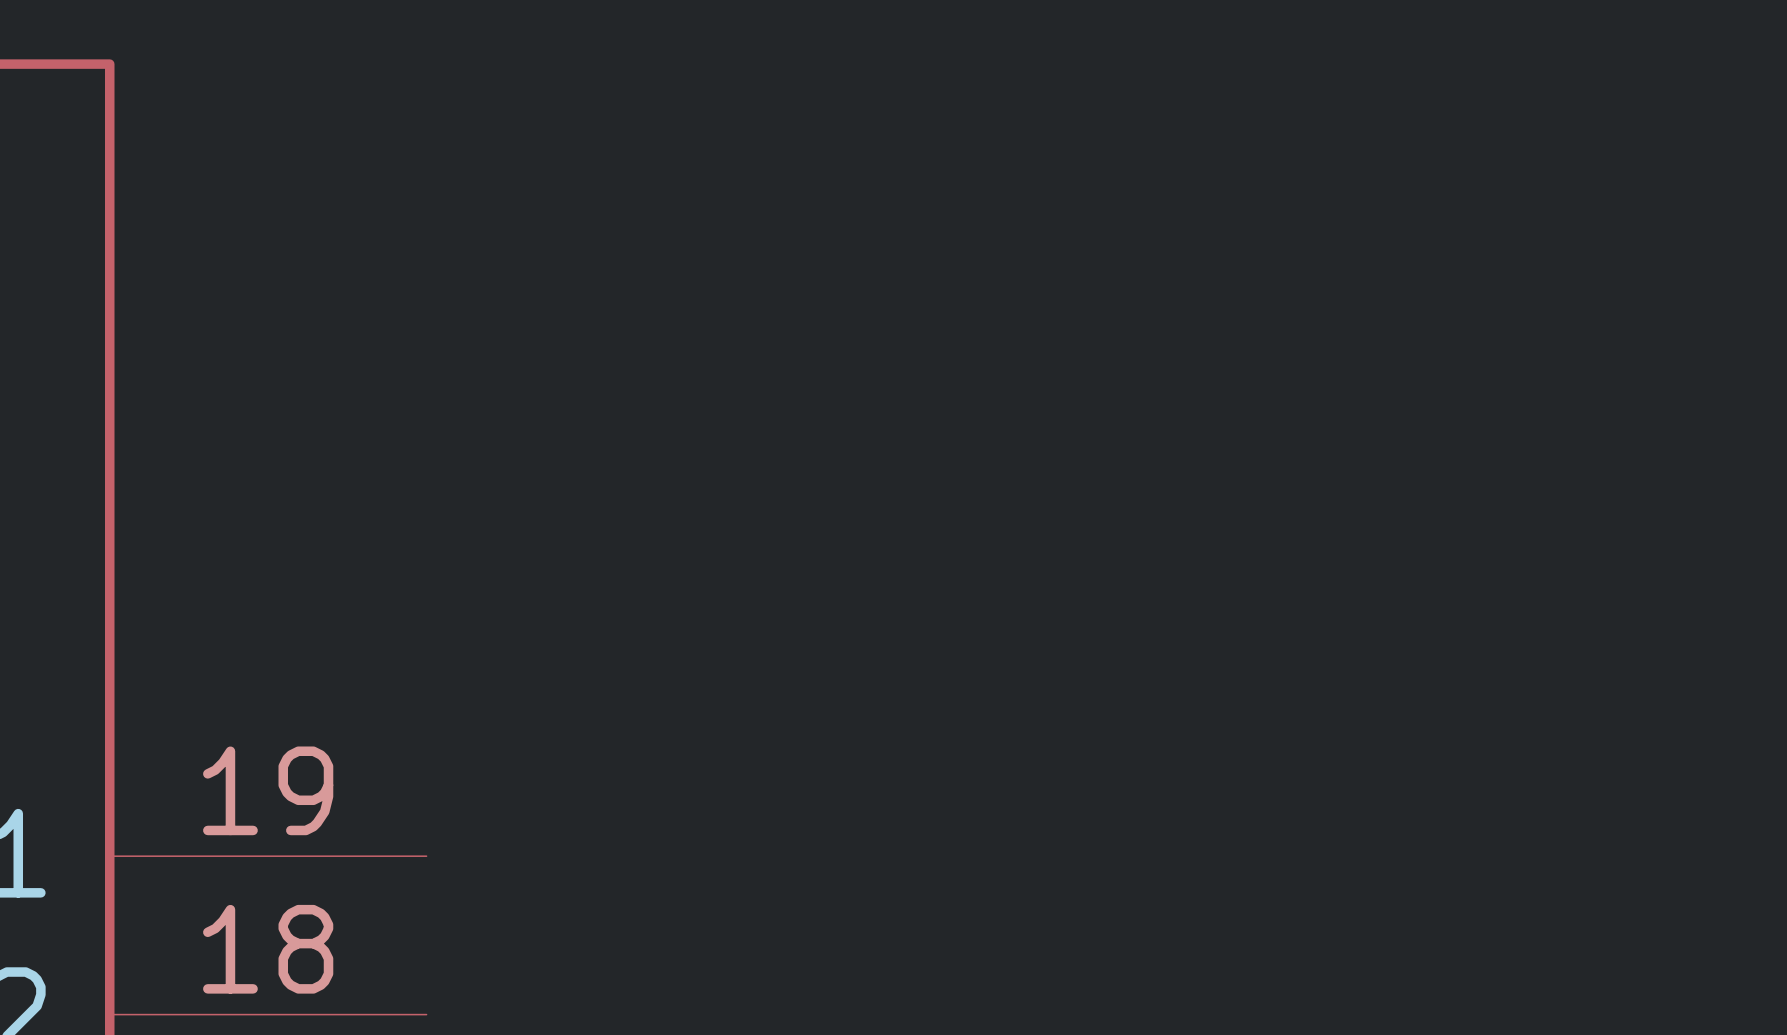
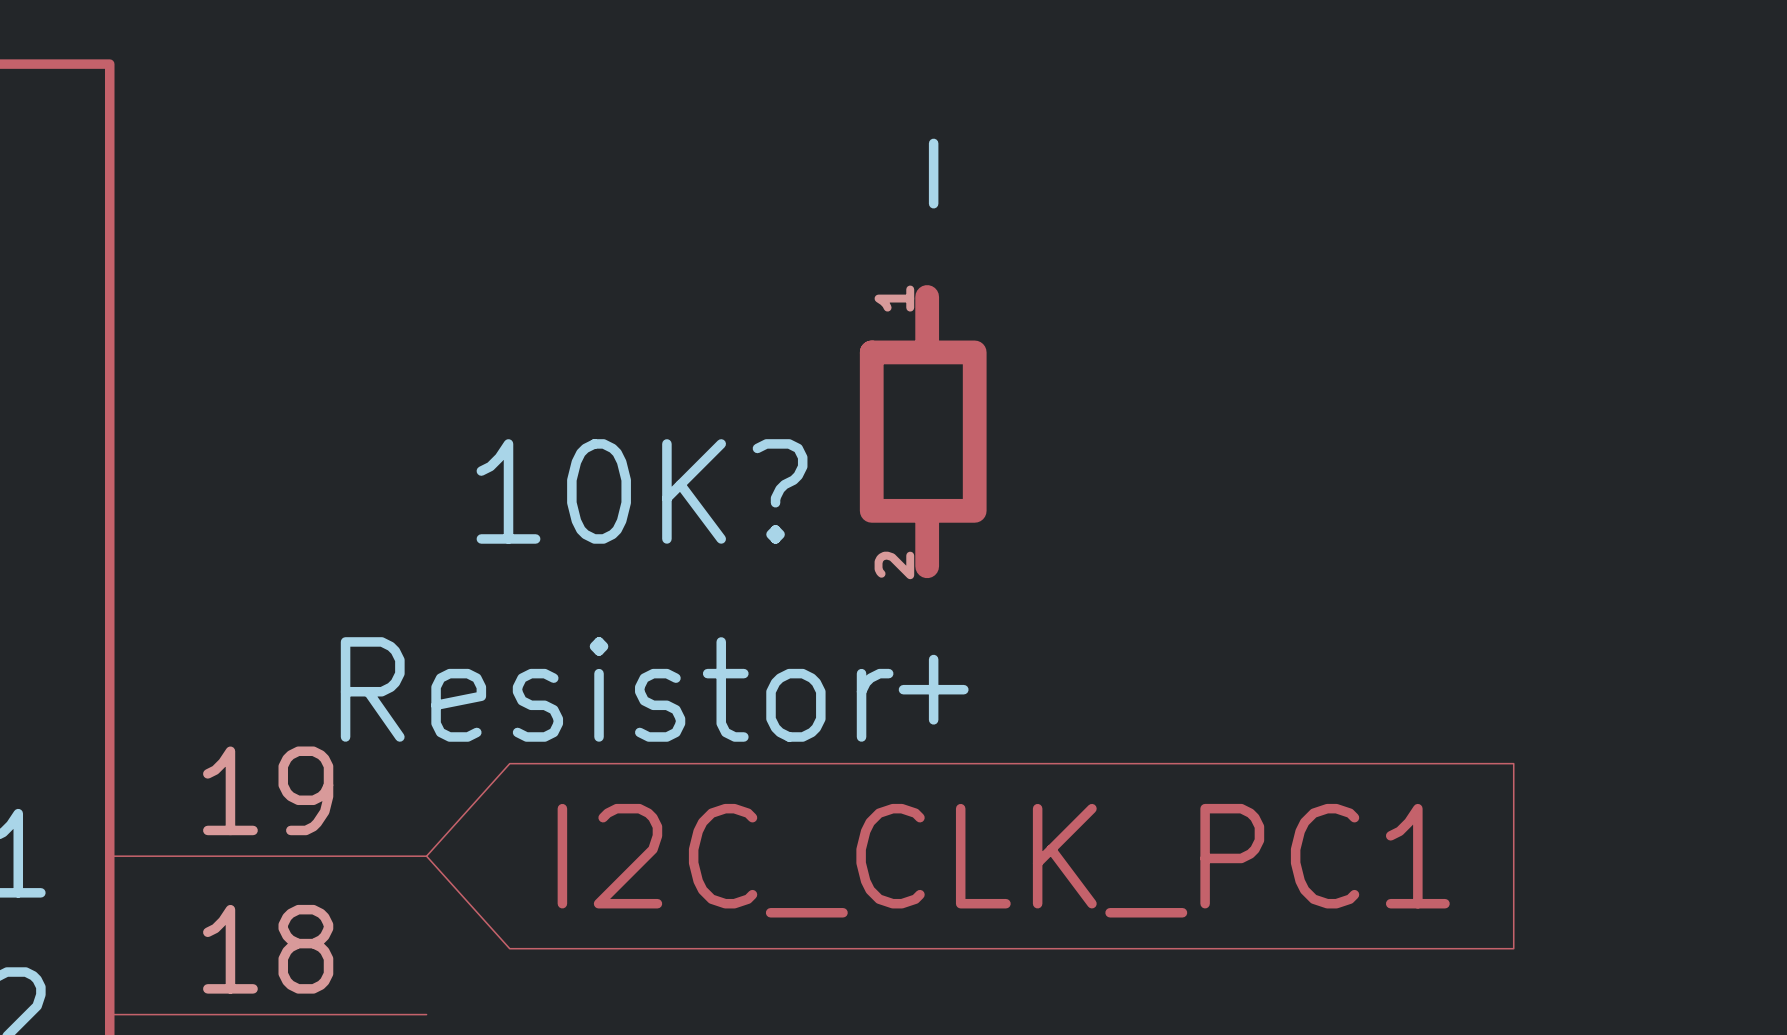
10K?: none -> Resistor (923, 431)
global label: none -> I2C_CLK_PC1 (1003, 860)

